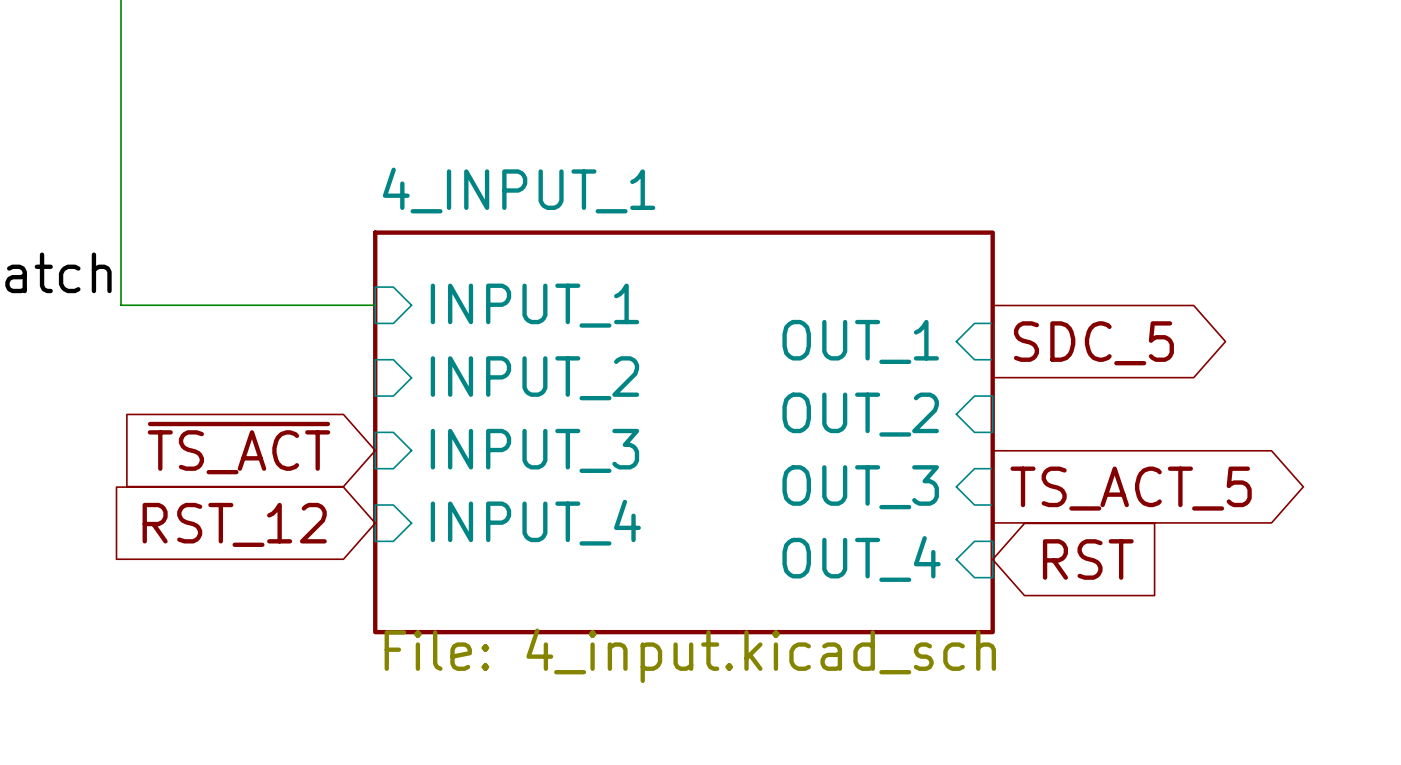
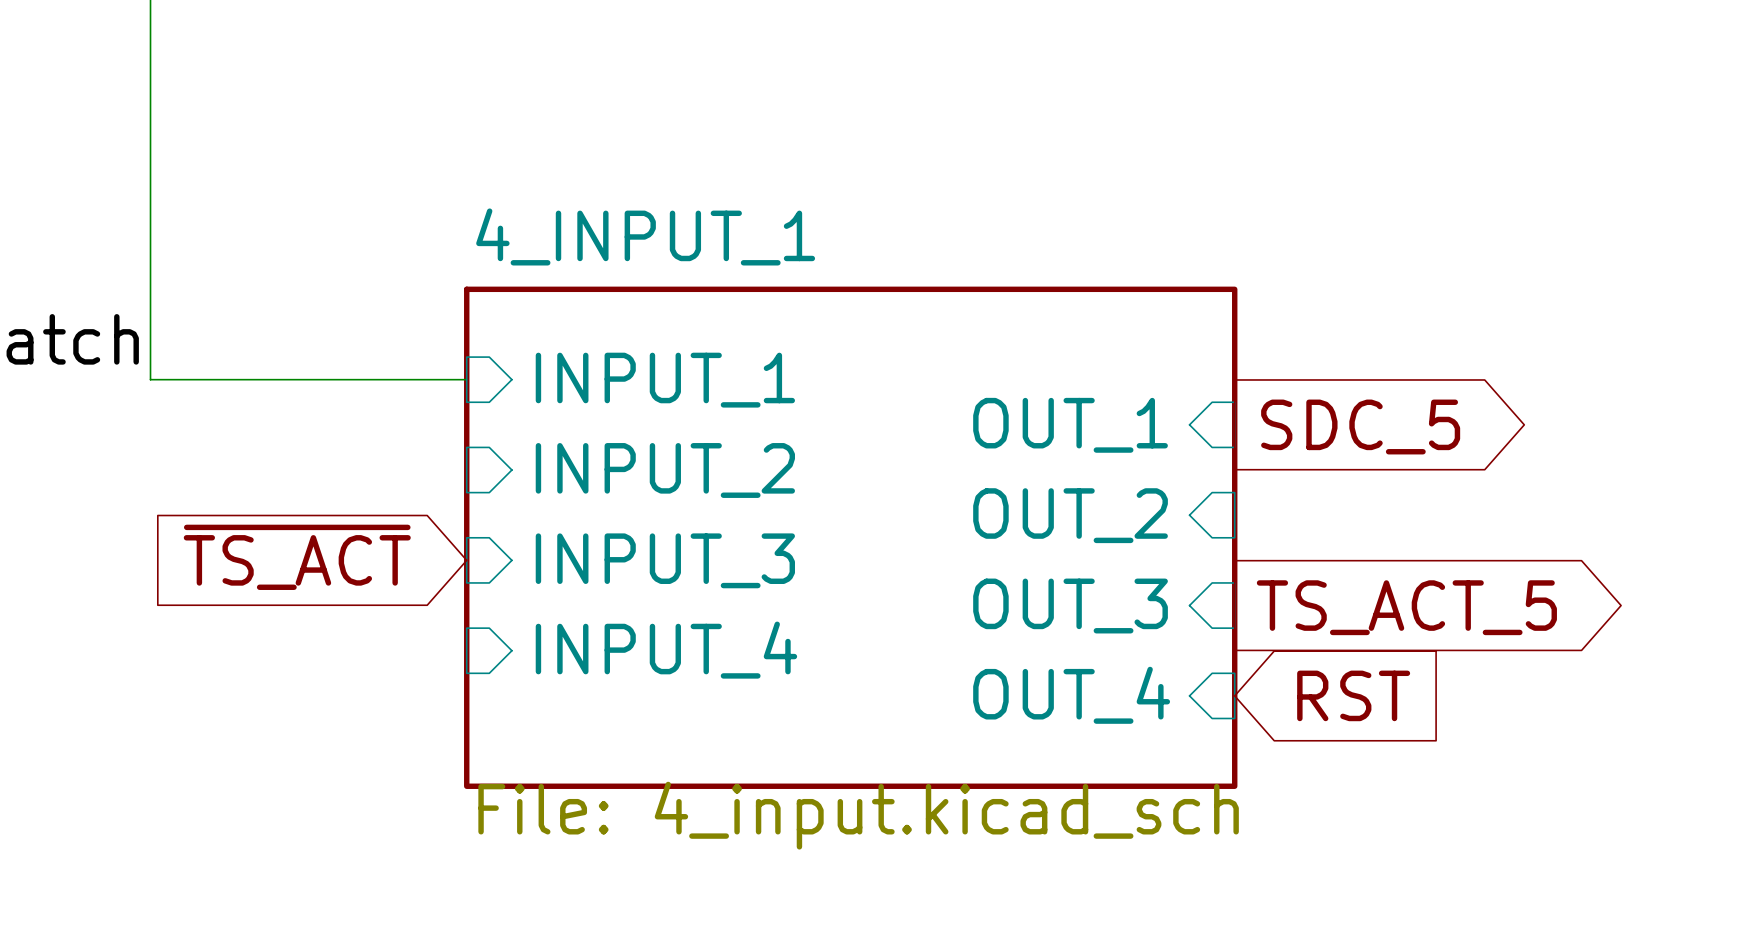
global label: RST_12 (234, 524) -> none

